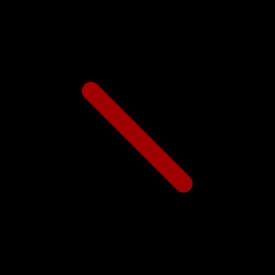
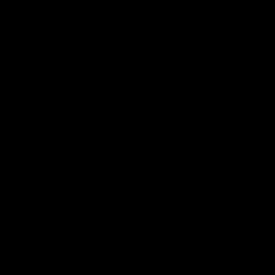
top track: (90, 90) (183, 183) -> none

